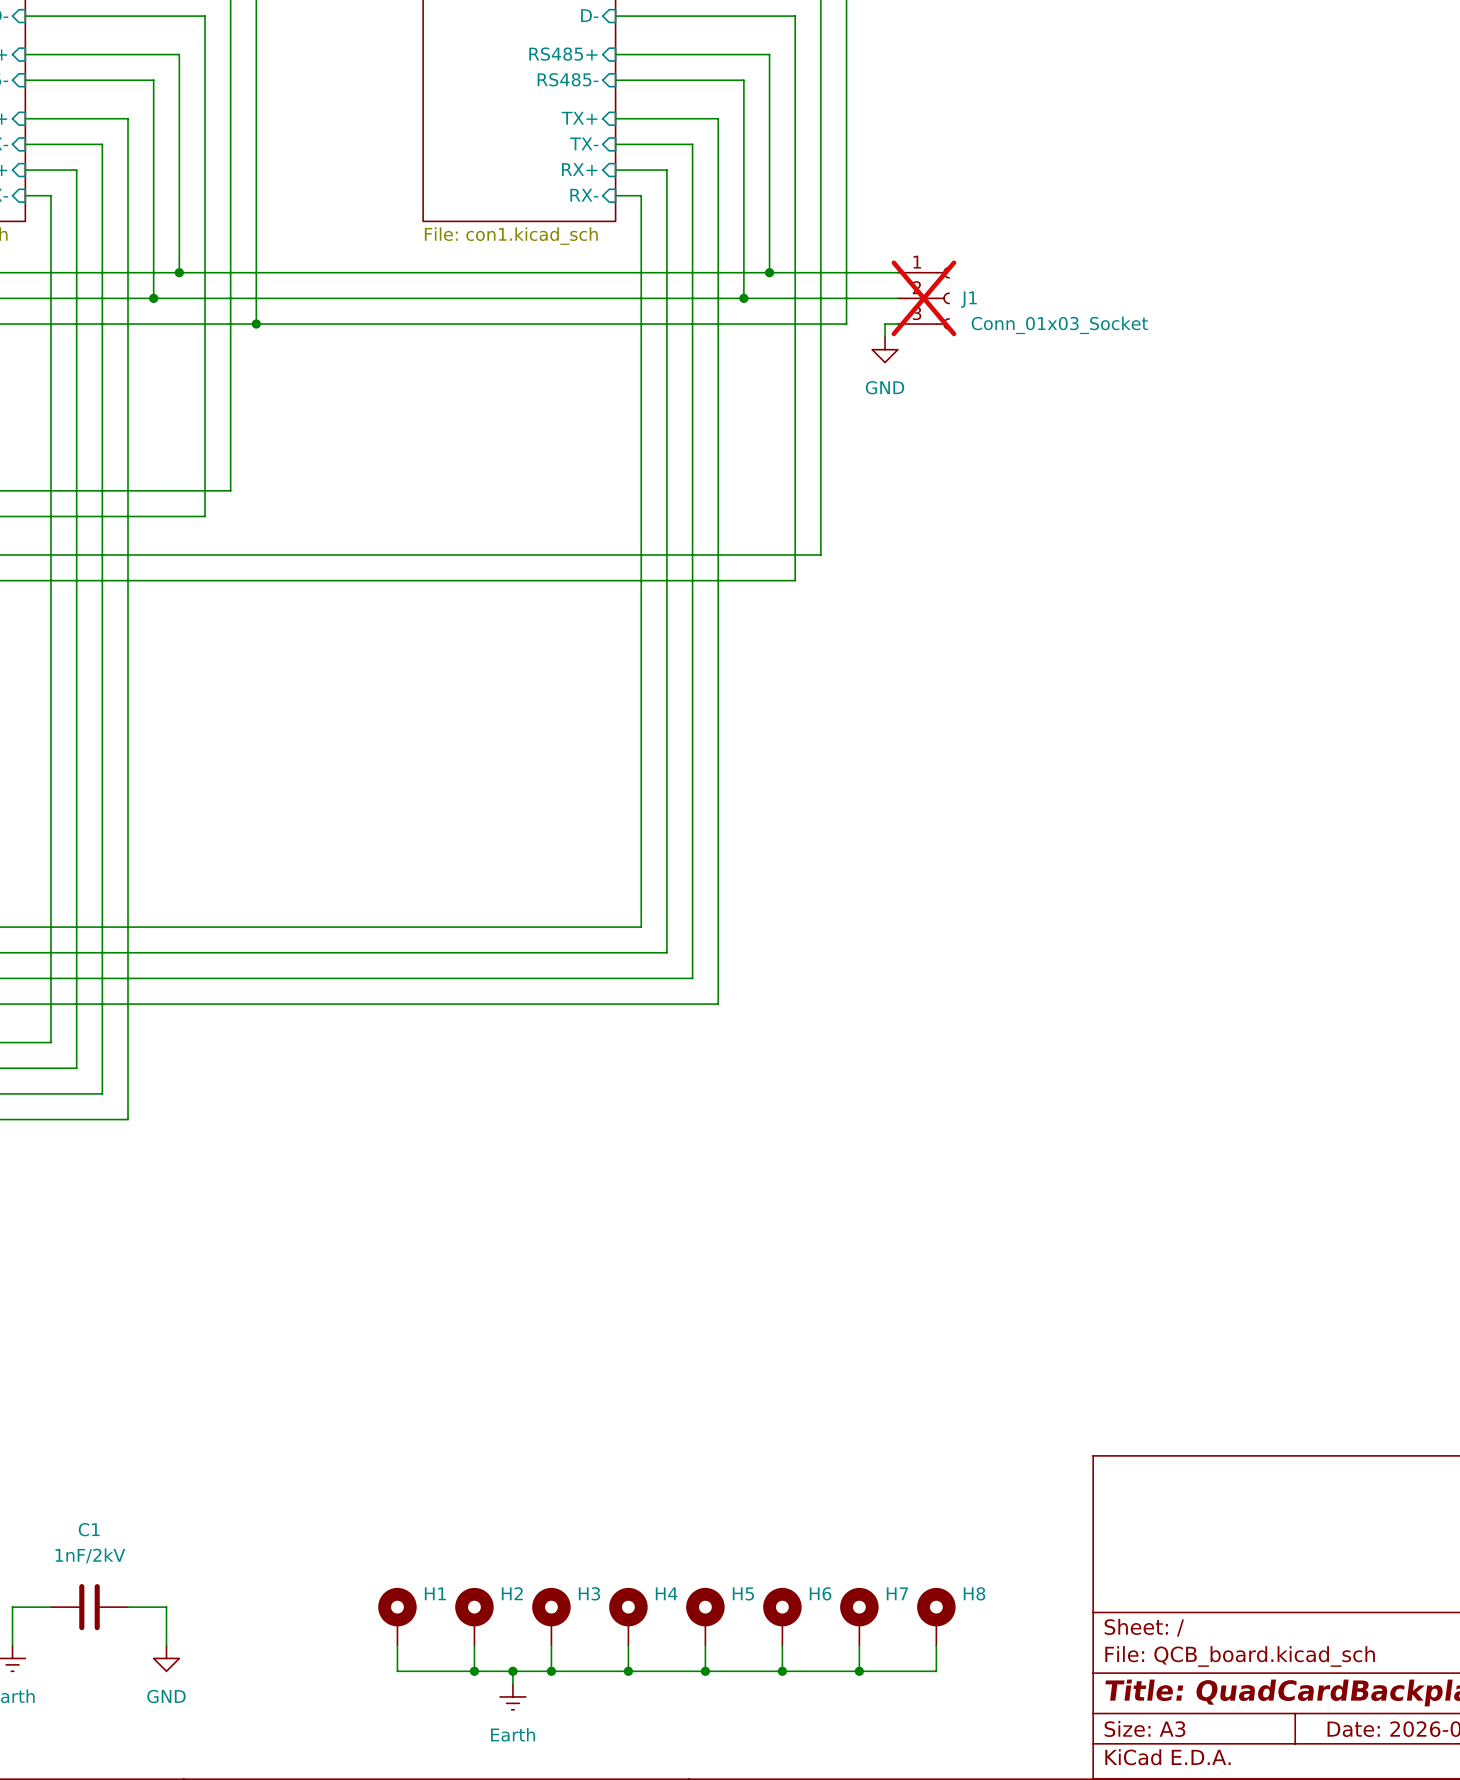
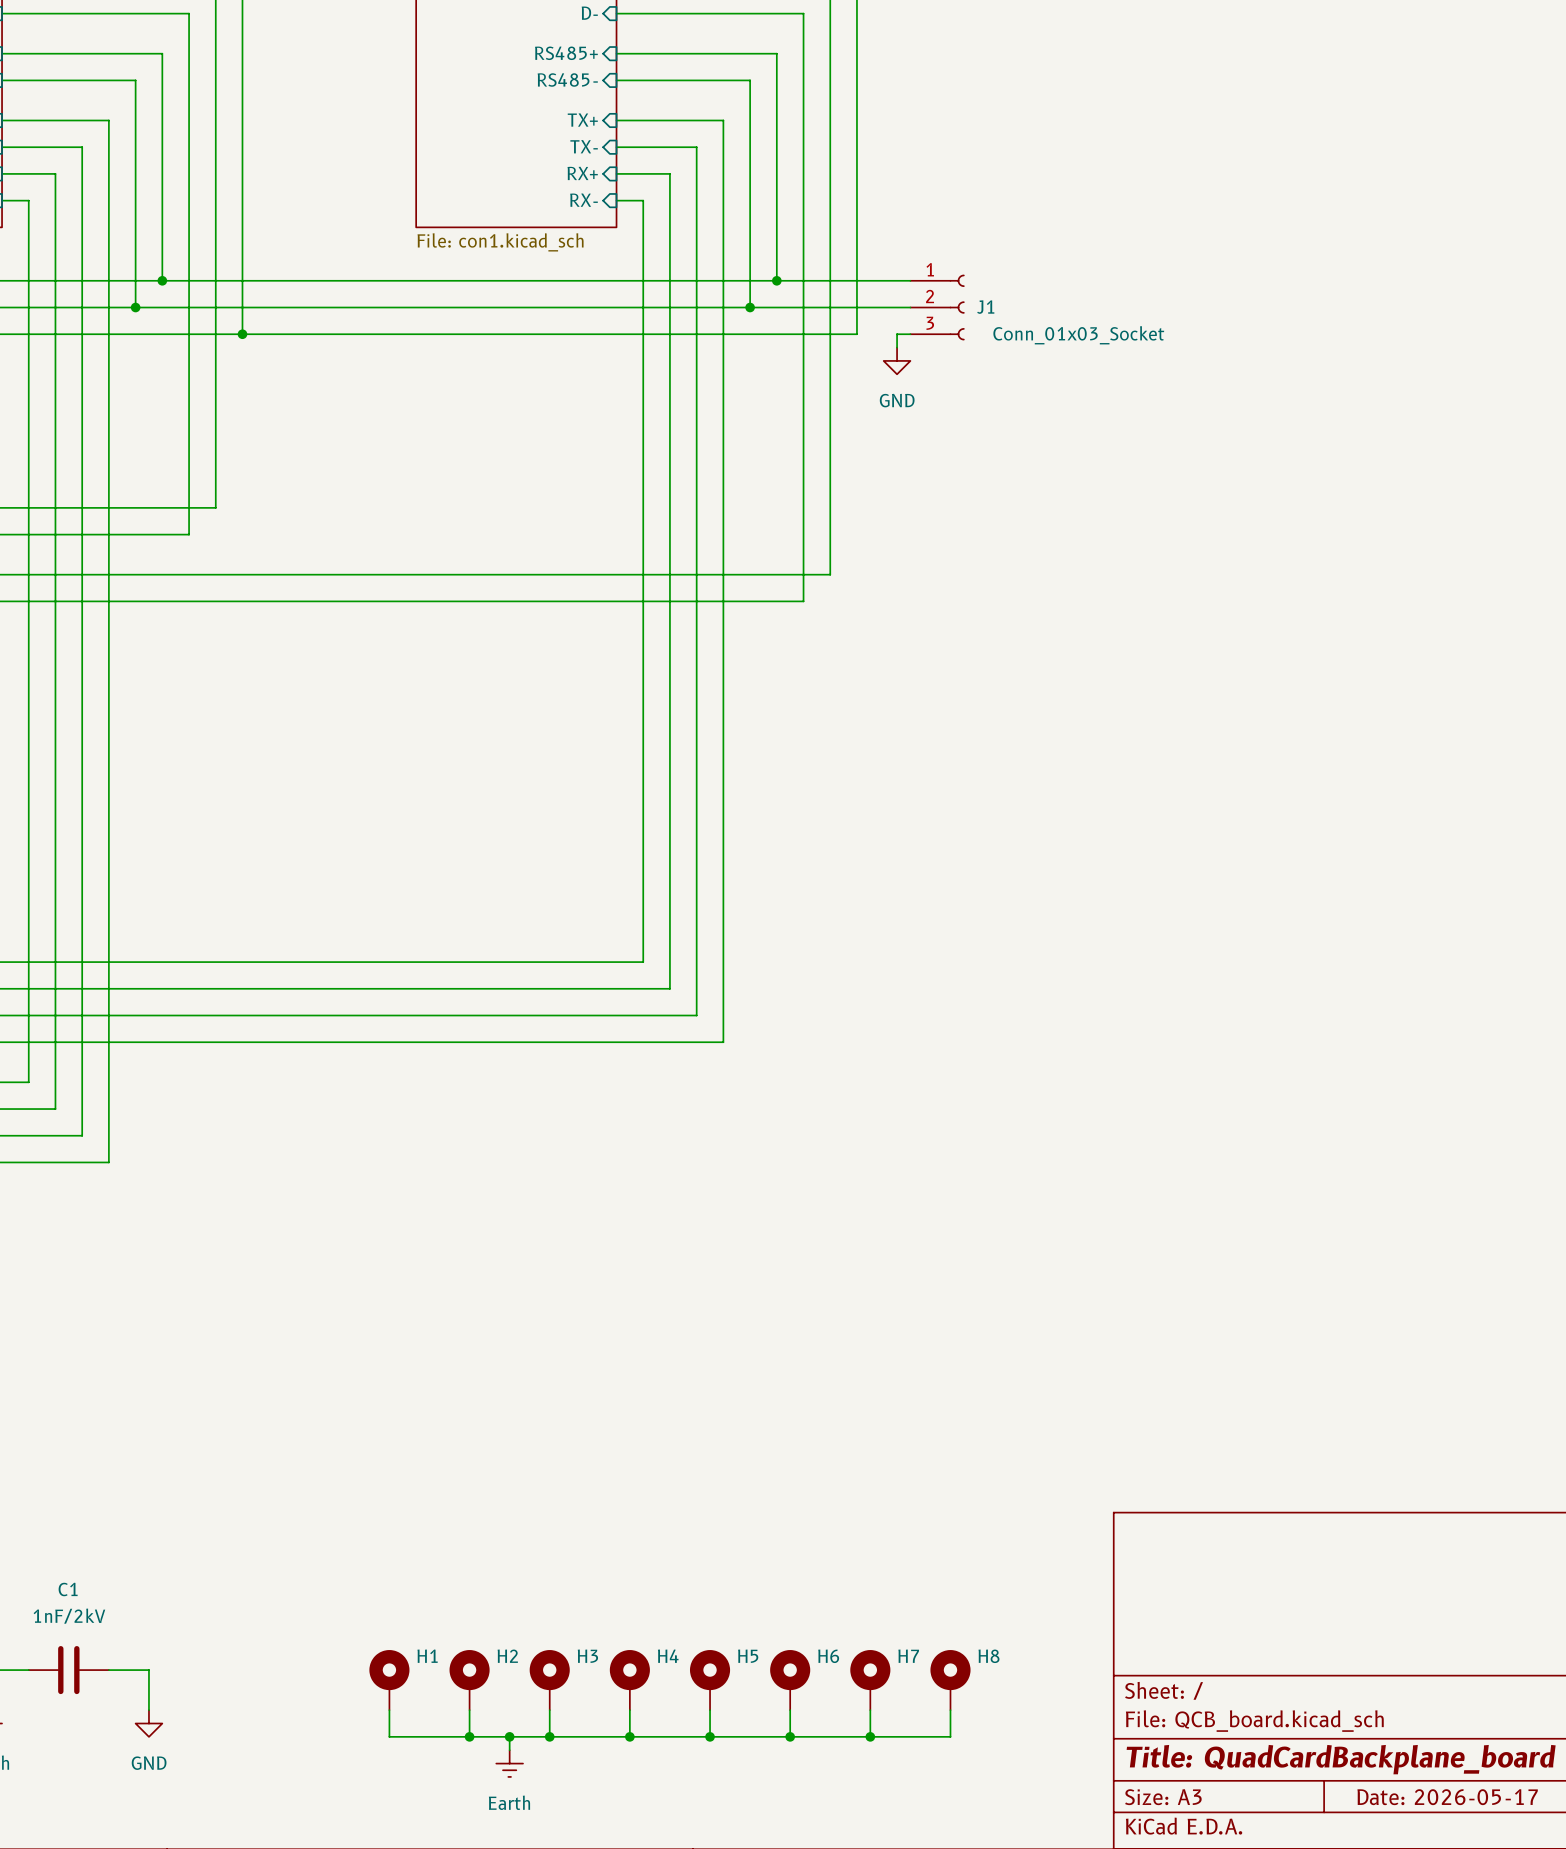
J1 do-not-place cross: (923, 298) -> none

